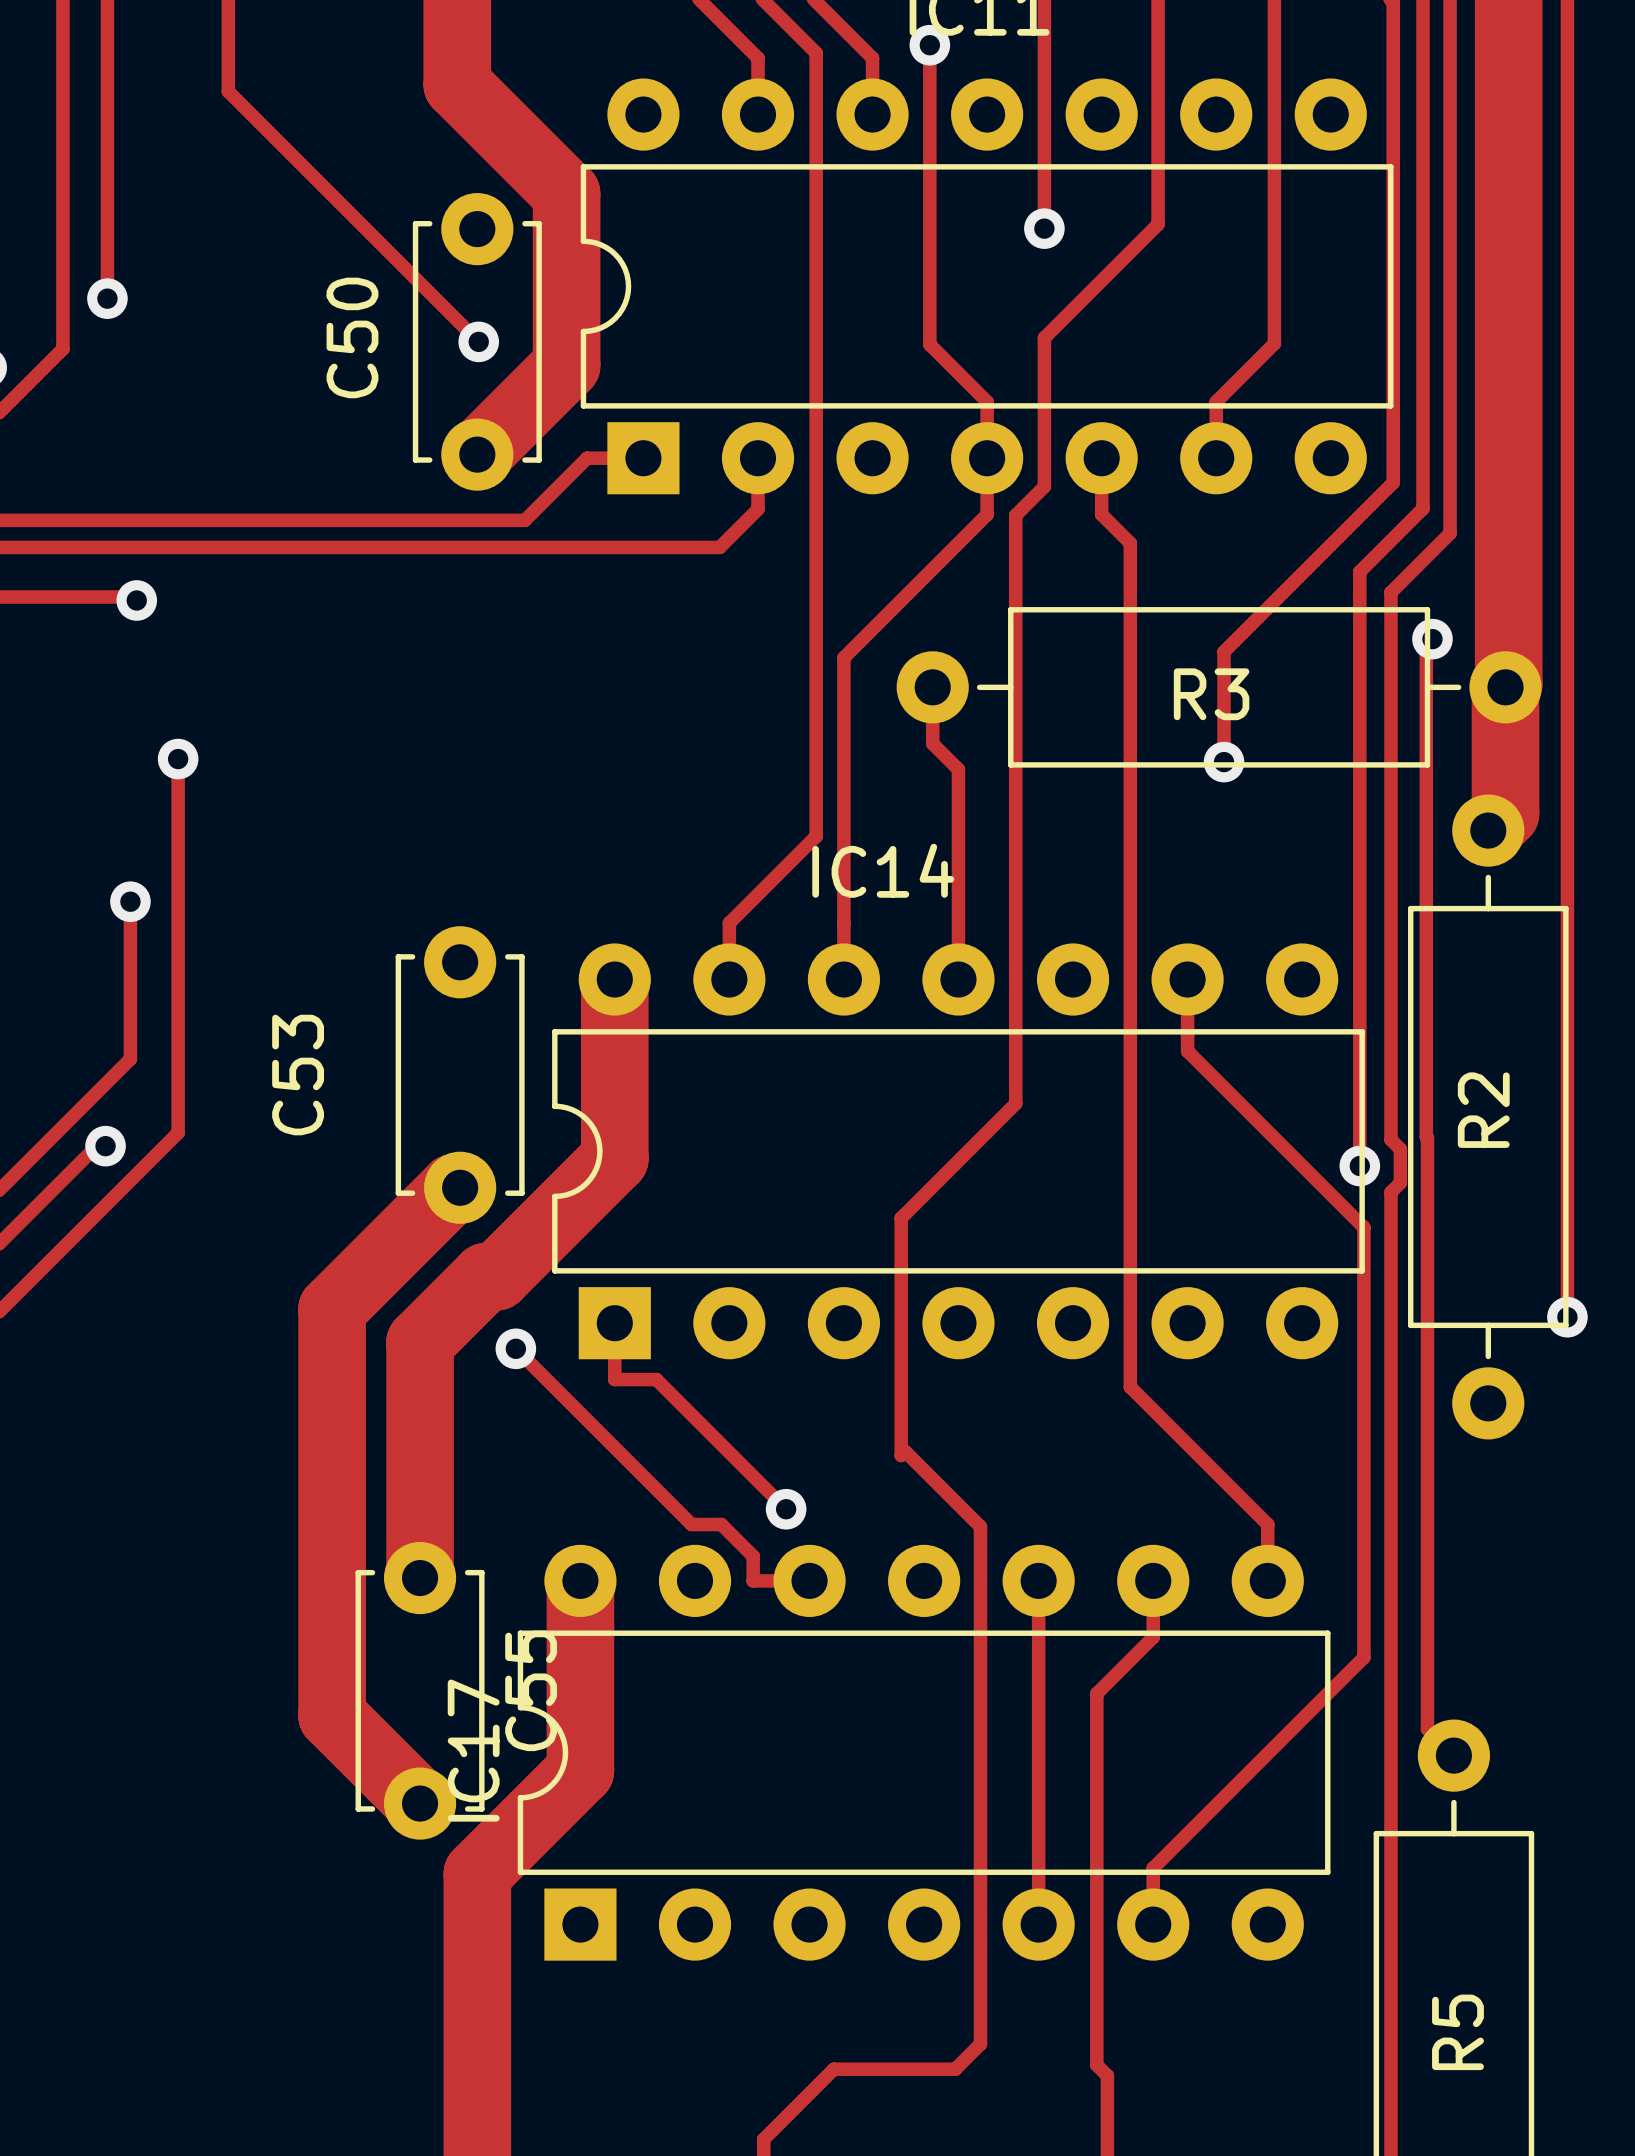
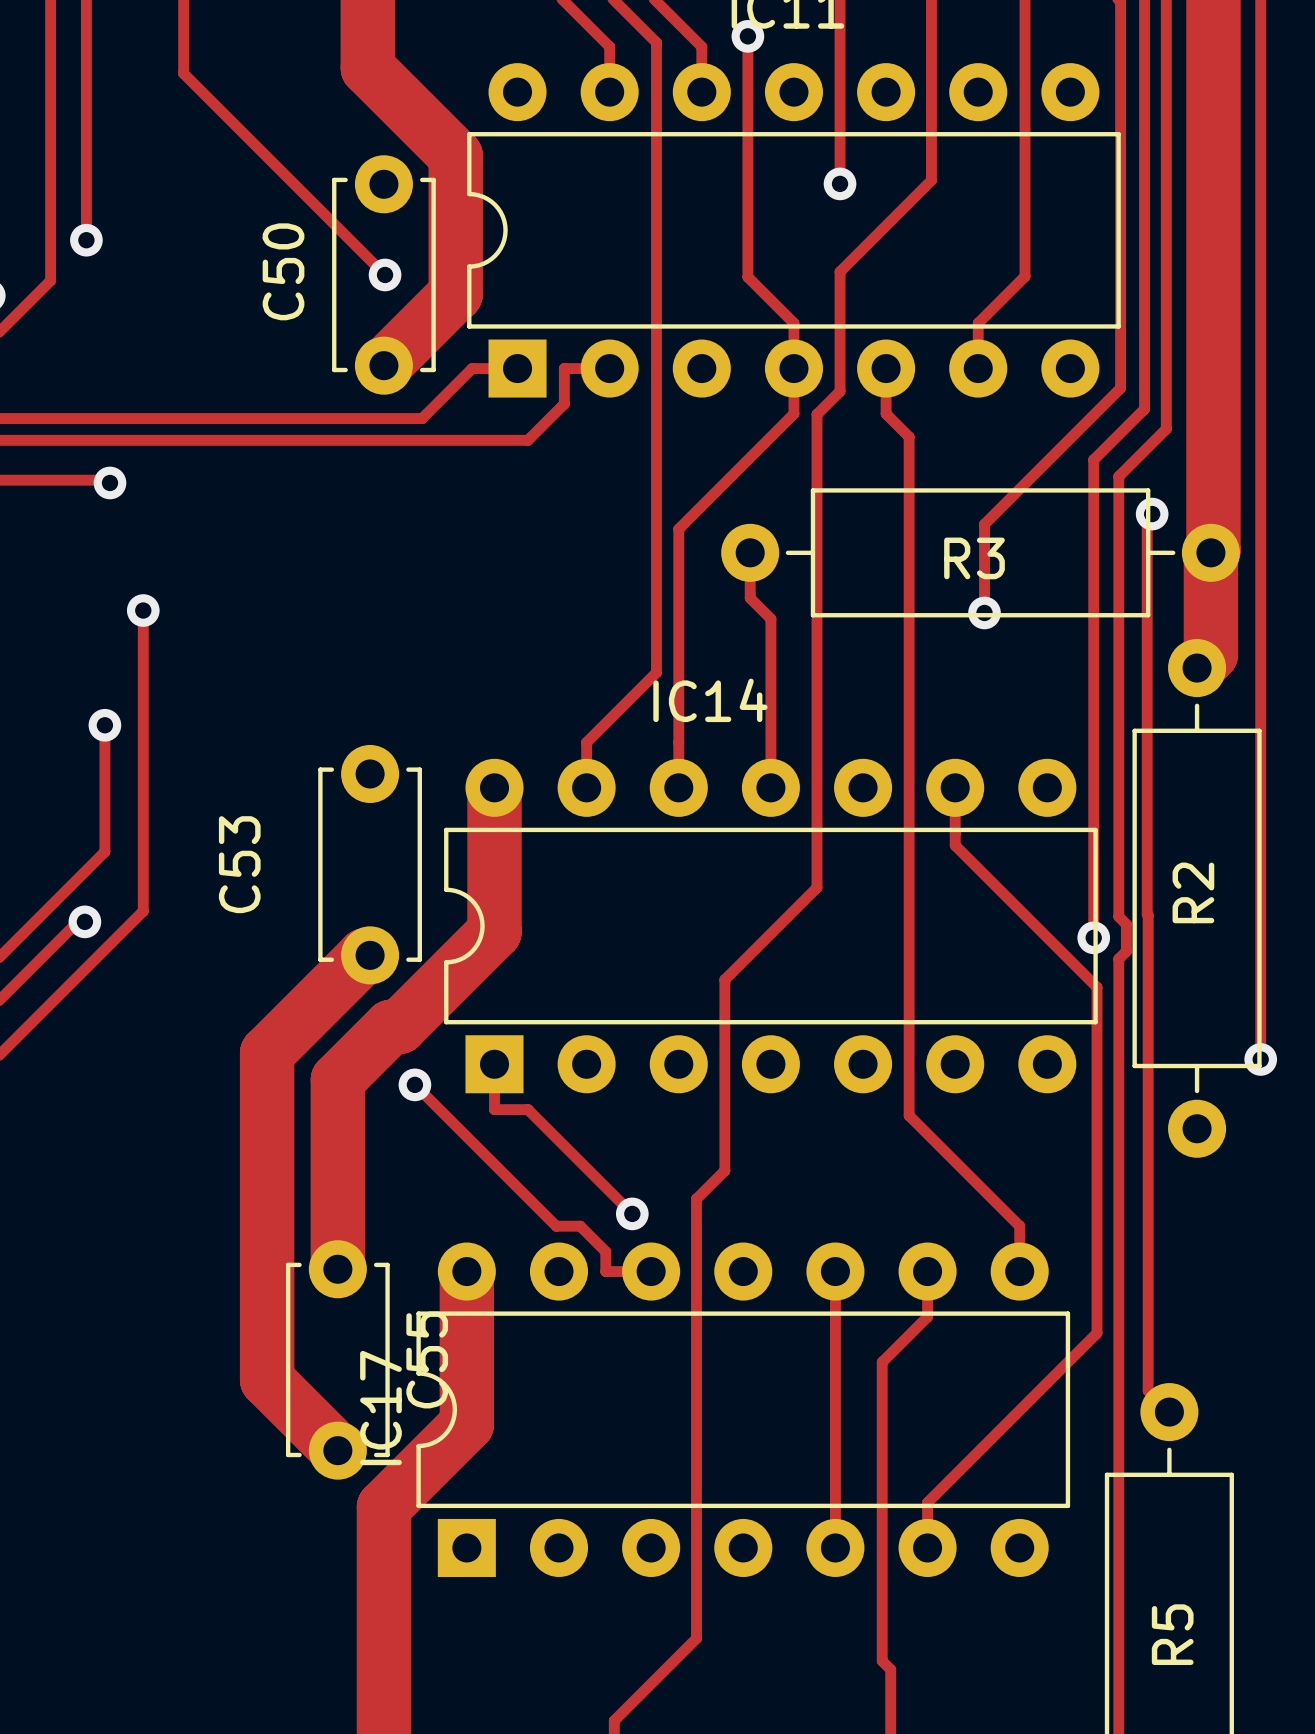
track: (758, 458) (758, 509) (719, 547) (656, 547) -> (609, 368) (564, 368) (564, 403) (527, 440)
track: (901, 1455) (905, 1452) (980, 1526) (980, 2044) (955, 2069) (833, 2069) -> (724, 1170) (696, 1199) (696, 1638) (670, 1664)

